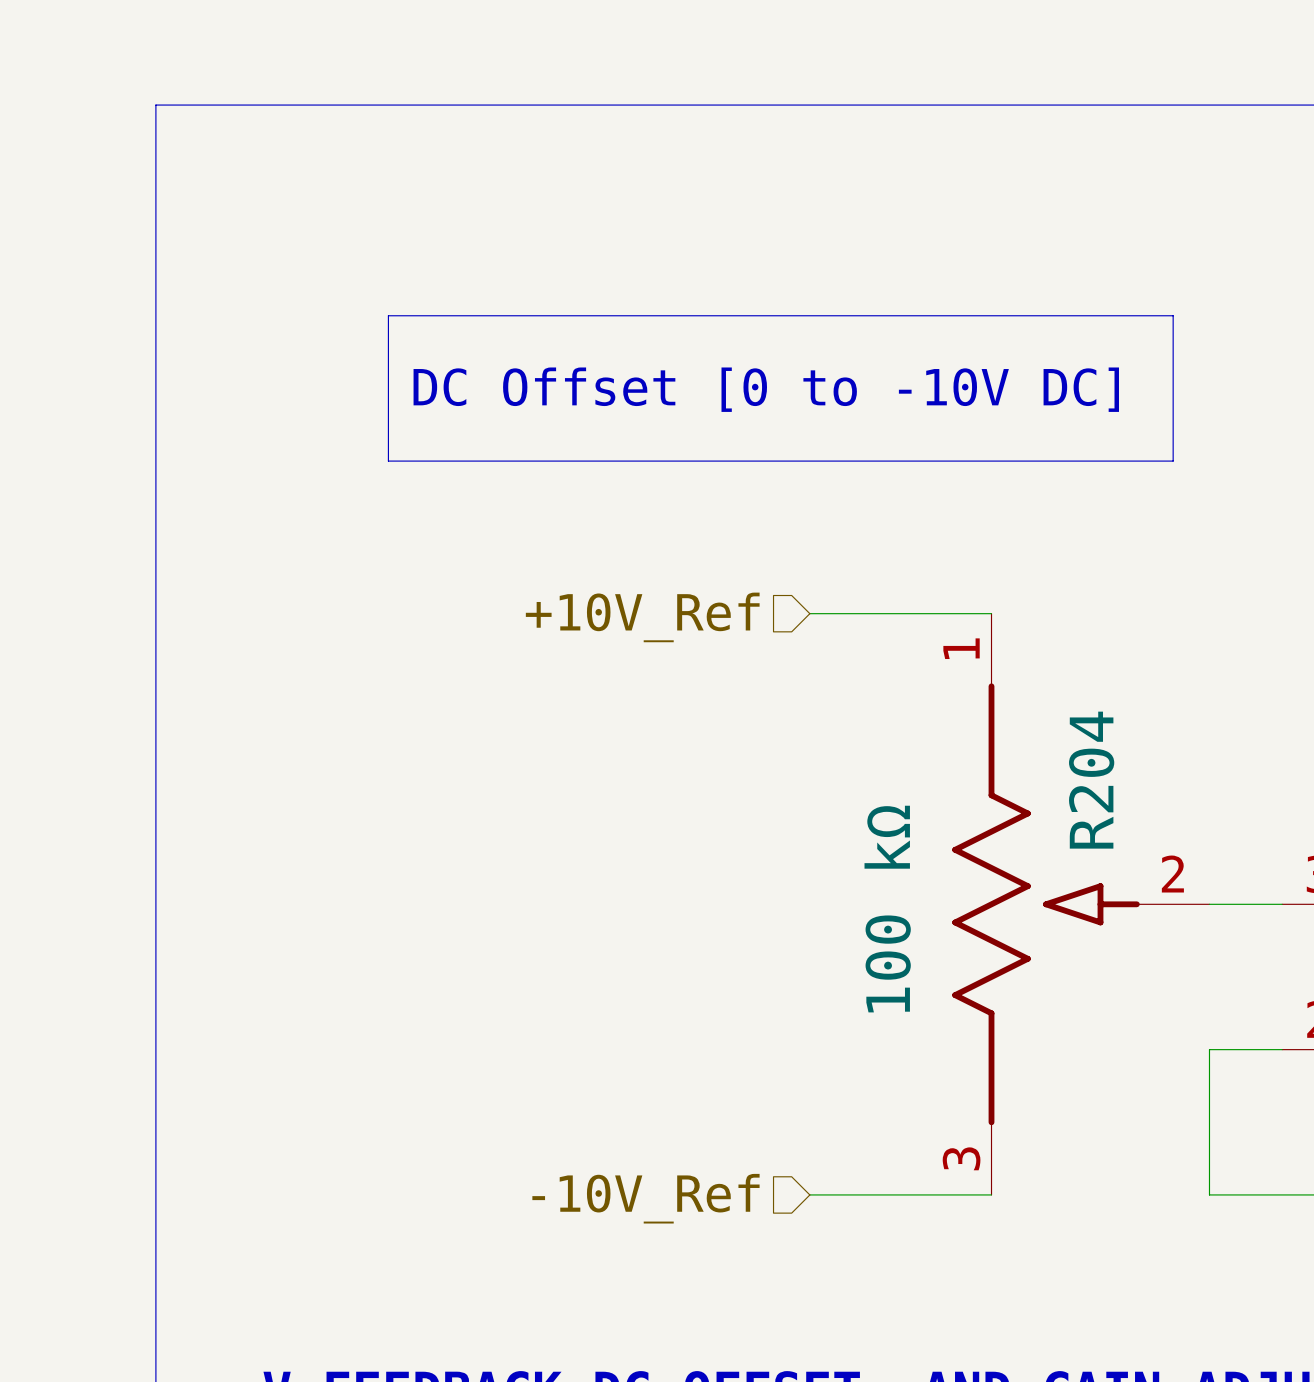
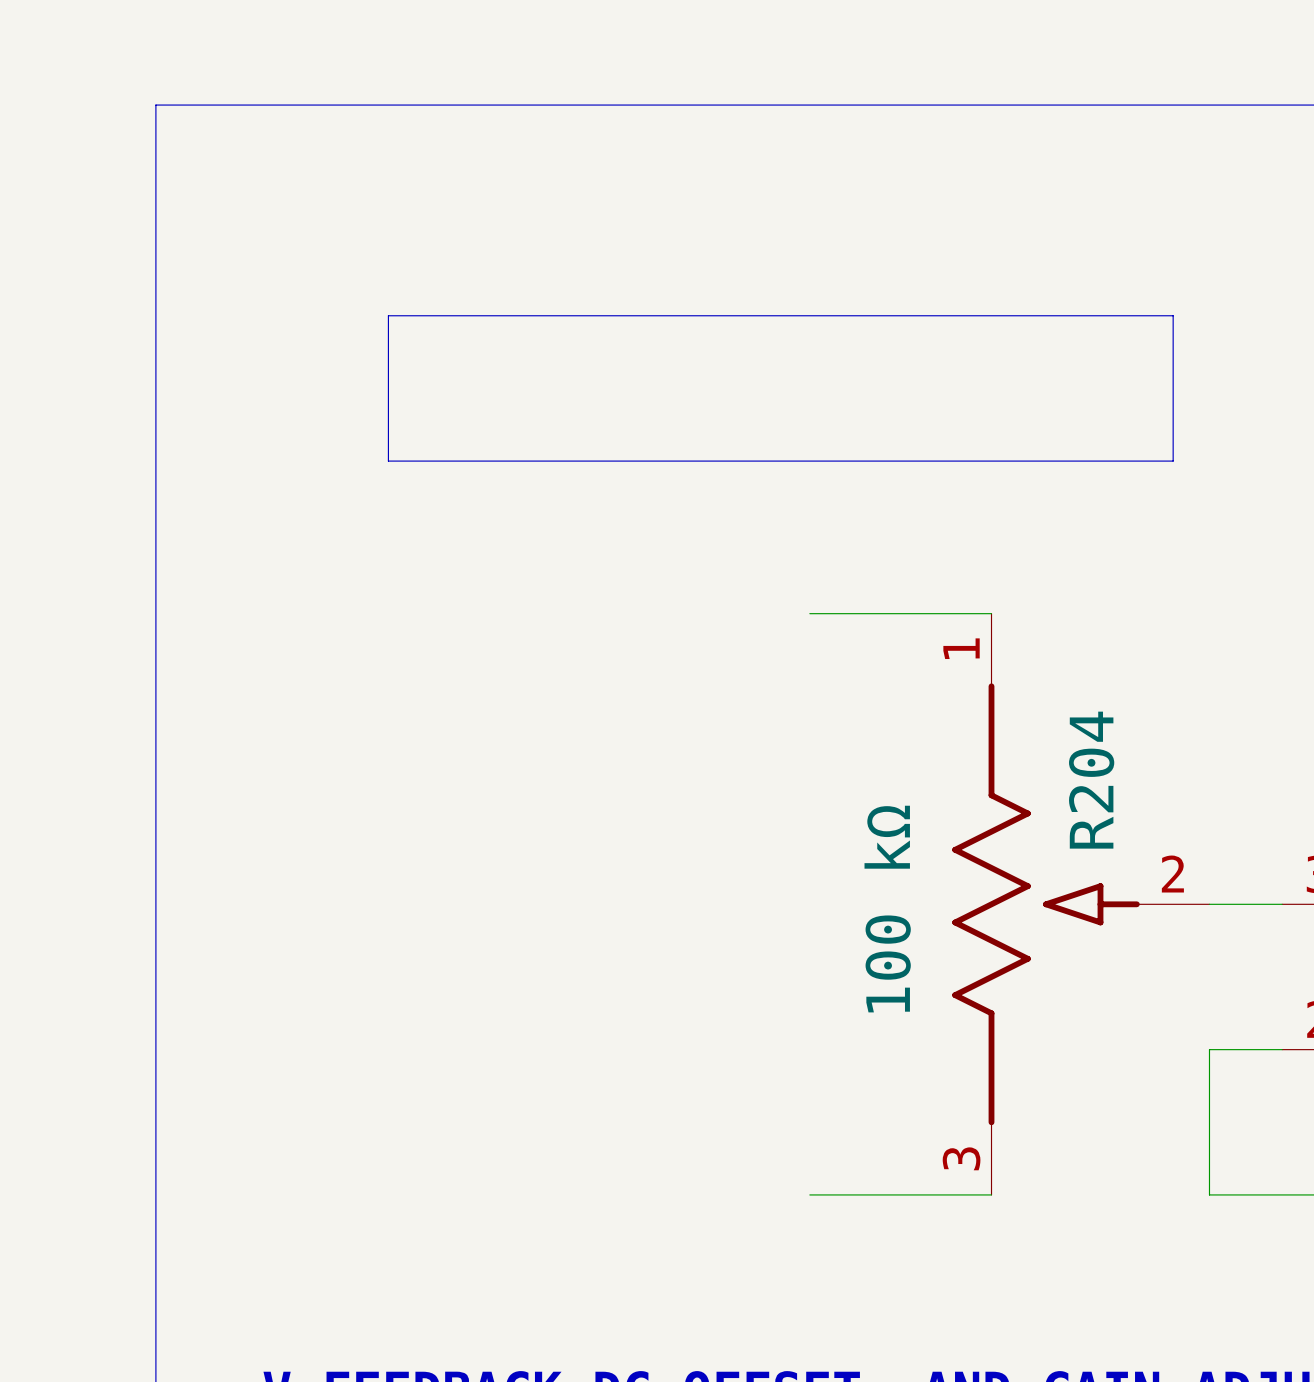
text: DC Offset [0 to -10V DC] (766, 389) -> none
hierarchical label: +10V_Ref (642, 617) -> none
hierarchical label: -10V_Ref (645, 1198) -> none

